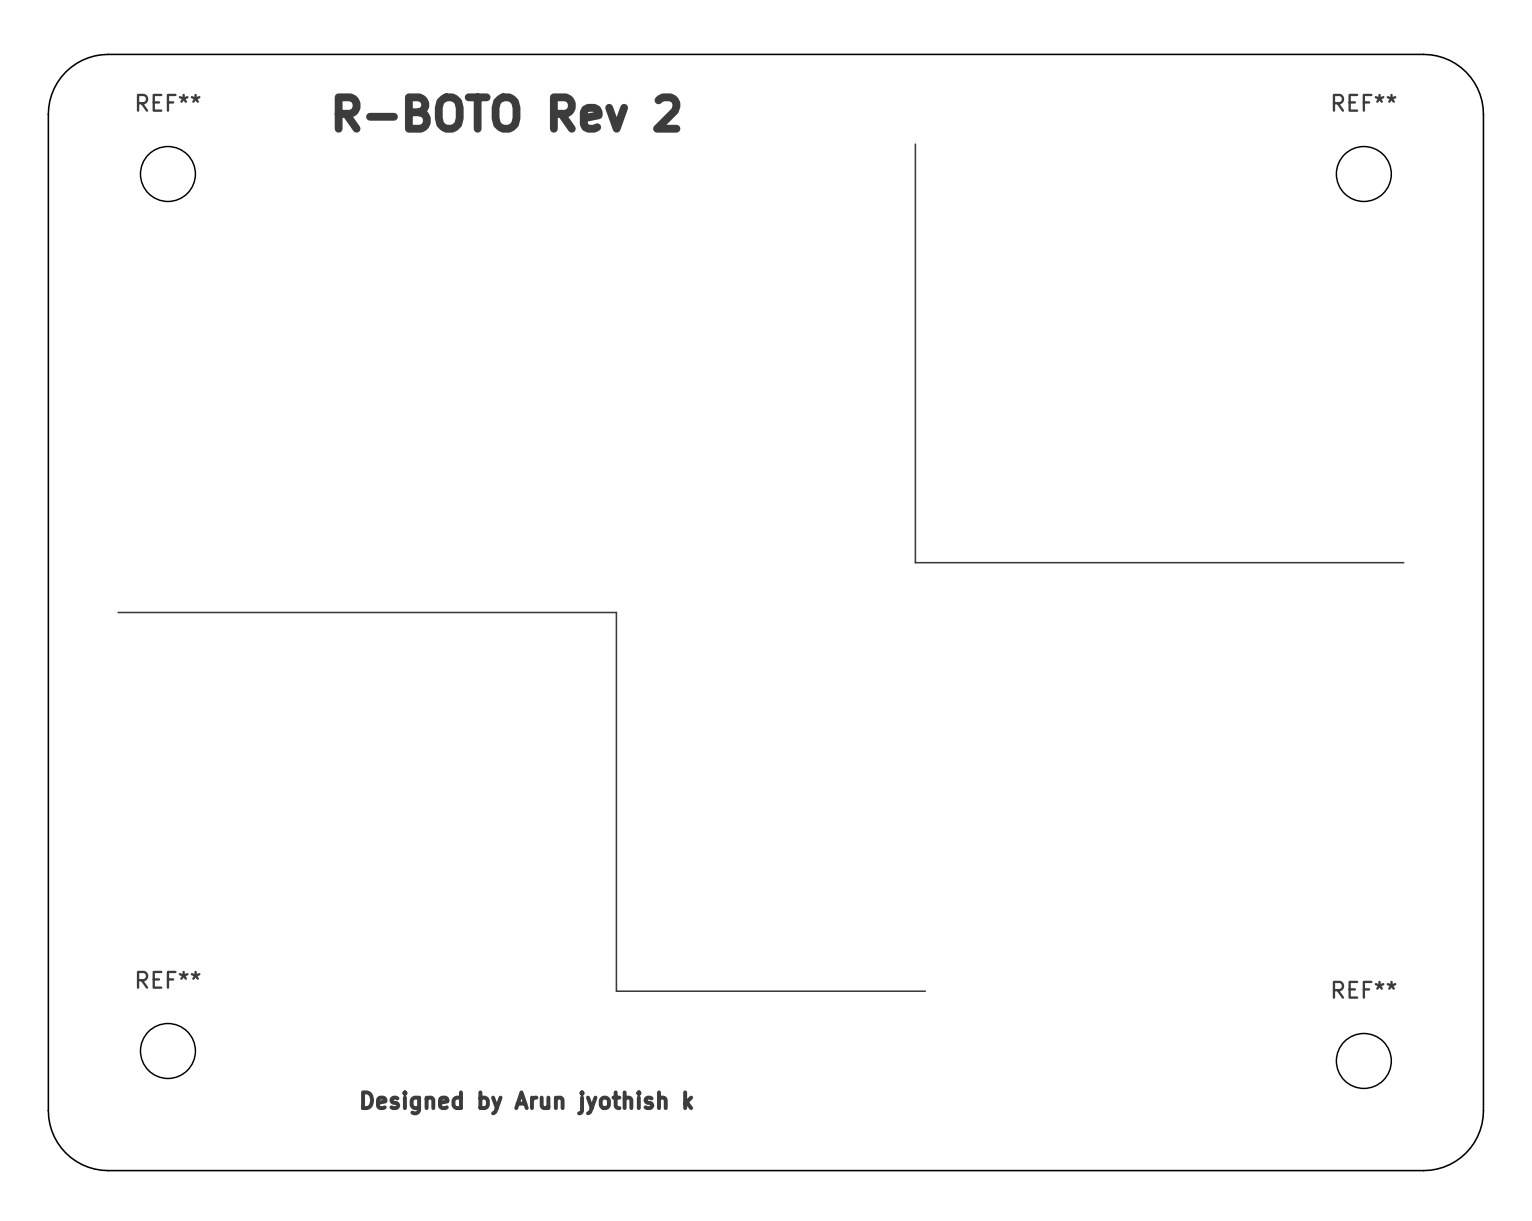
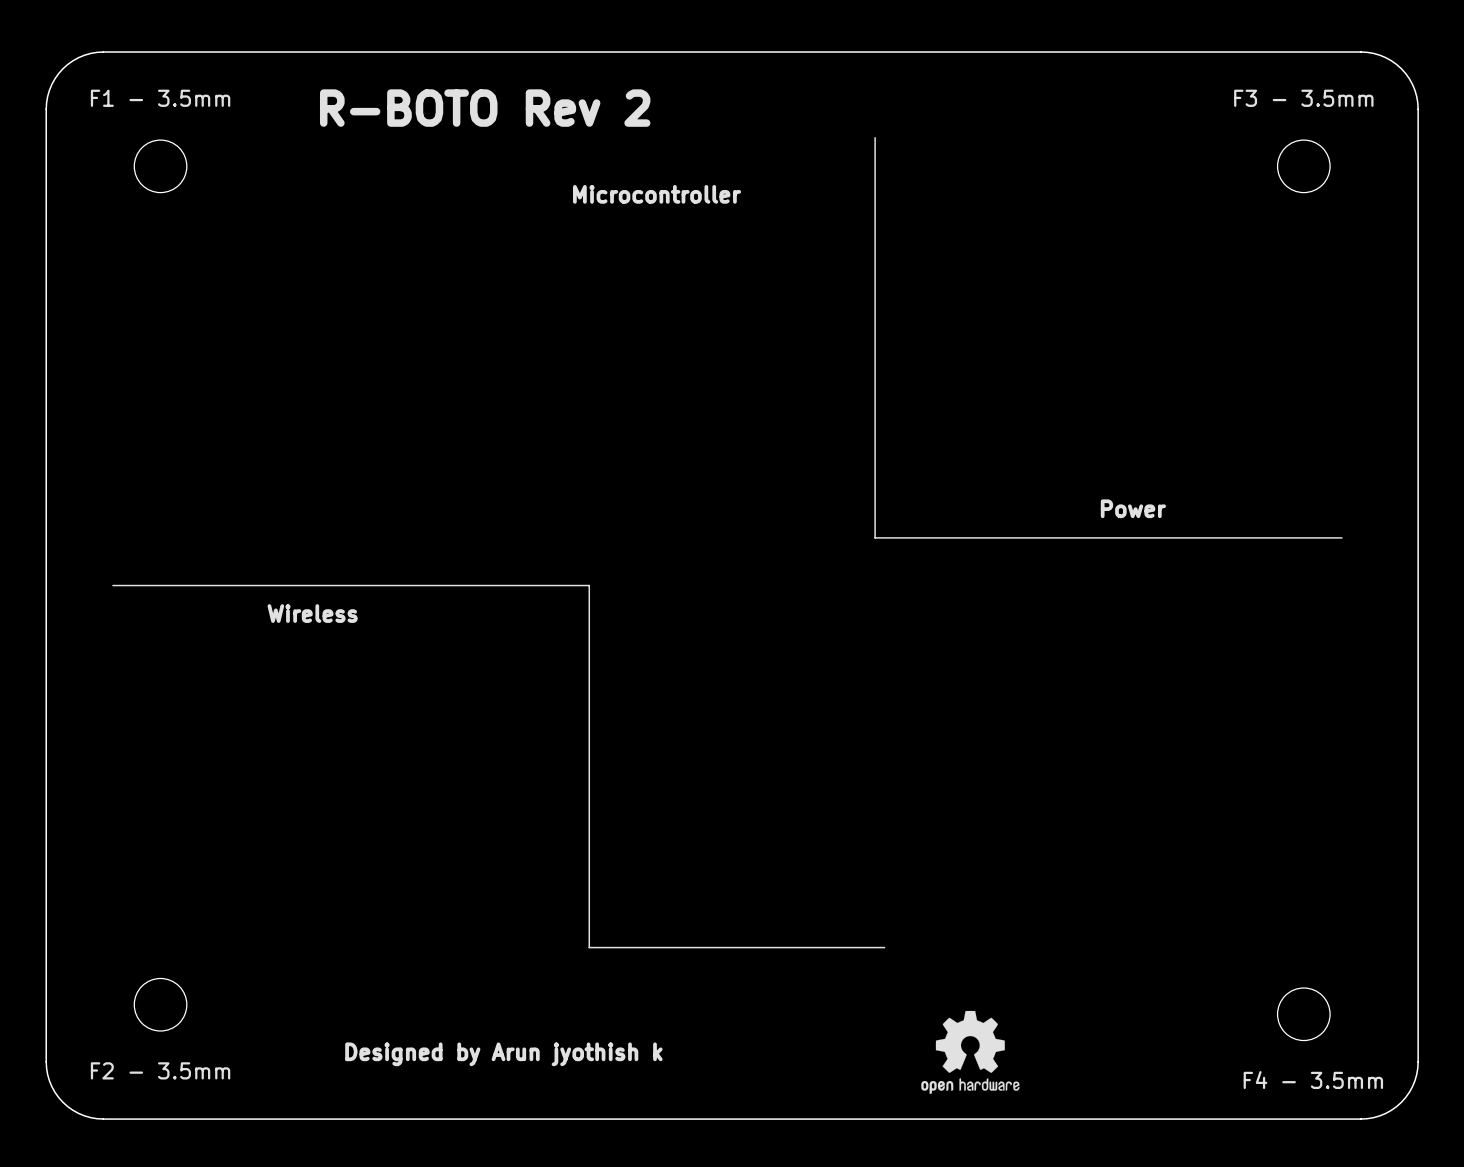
REF** name: REF** (168, 102) -> F1 - 3.5mm (160, 98)
REF** name: REF** (1364, 102) -> F3 - 3.5mm (1303, 98)
text: none -> Microcontroller (657, 194)
text: none -> Power (1133, 508)
text: none -> Wireless (312, 613)
REF** name: REF** (168, 979) -> F2 - 3.5mm (160, 1070)
REF** name: REF** (1364, 989) -> F4 - 3.5mm (1313, 1080)
drawing: none -> [921, 1010, 1020, 1095]

